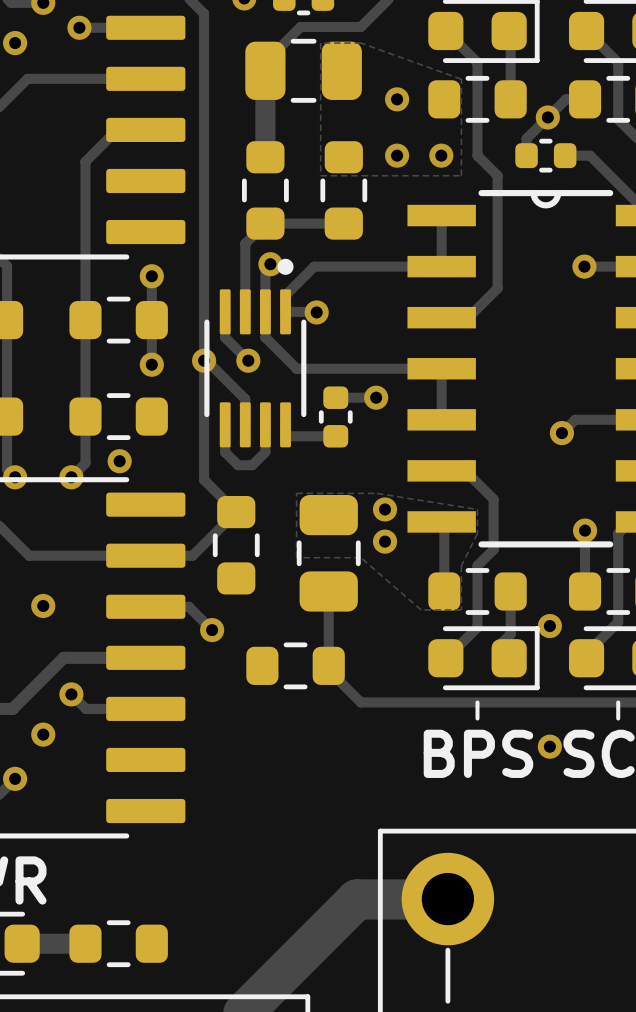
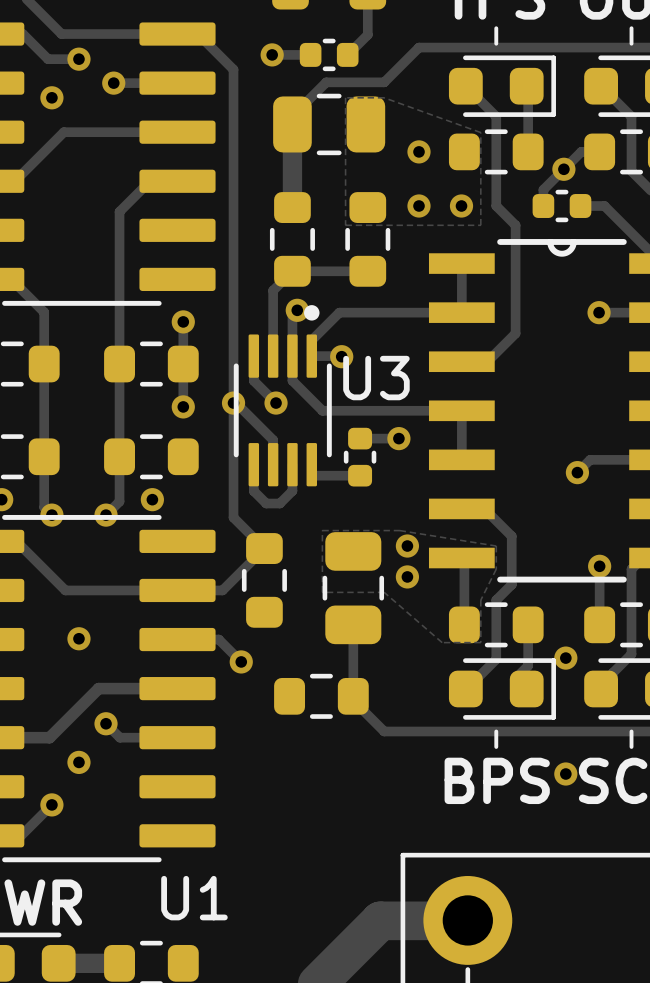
U3 name: none -> U3 (376, 378)
U1 name: none -> U1 (194, 898)

